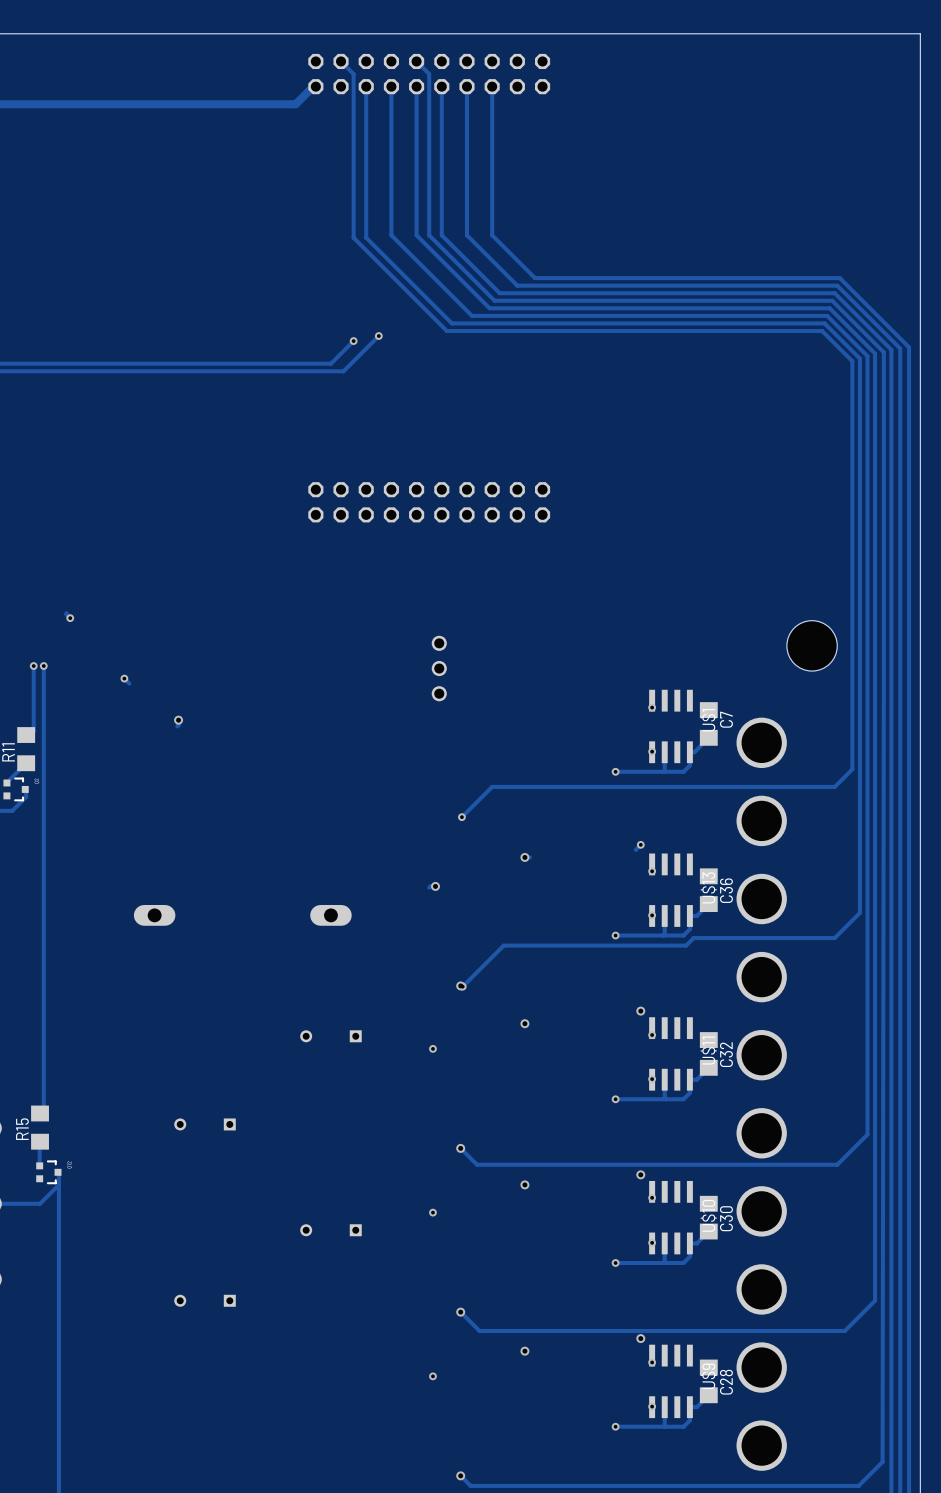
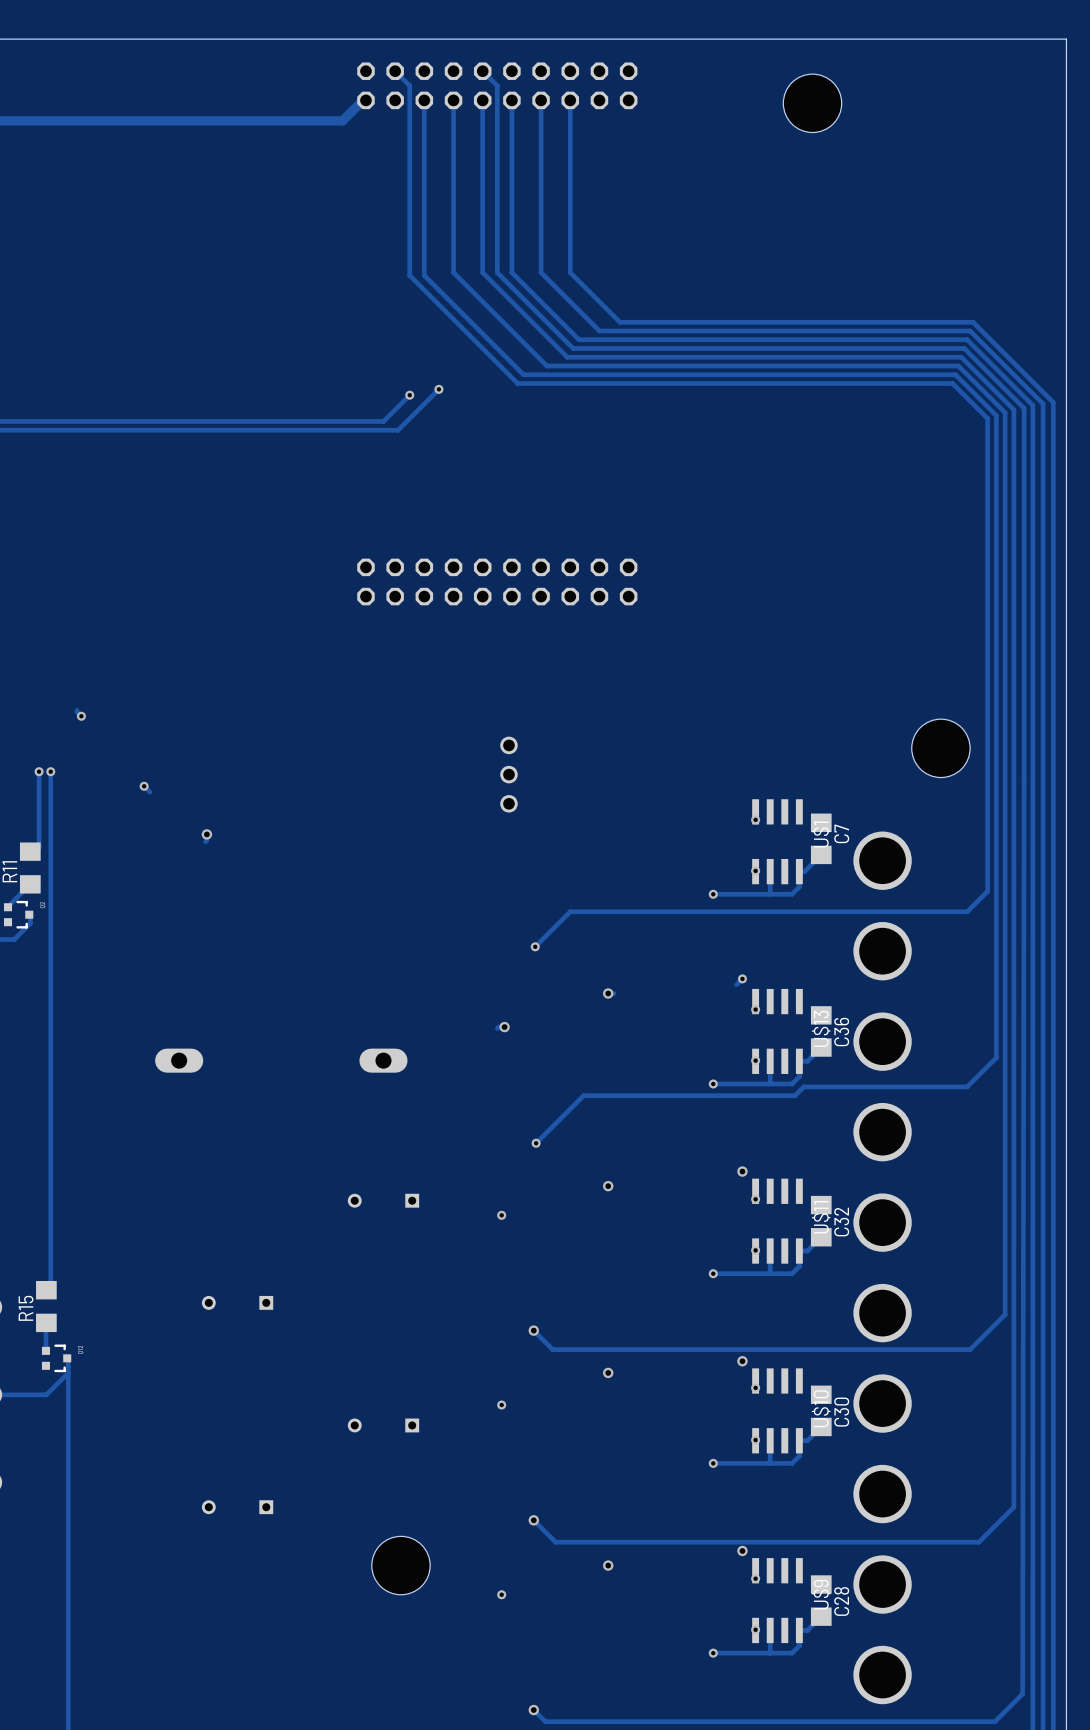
hole: none -> (812, 103)
via: (460, 985) -> none
hole: none -> (400, 1565)

